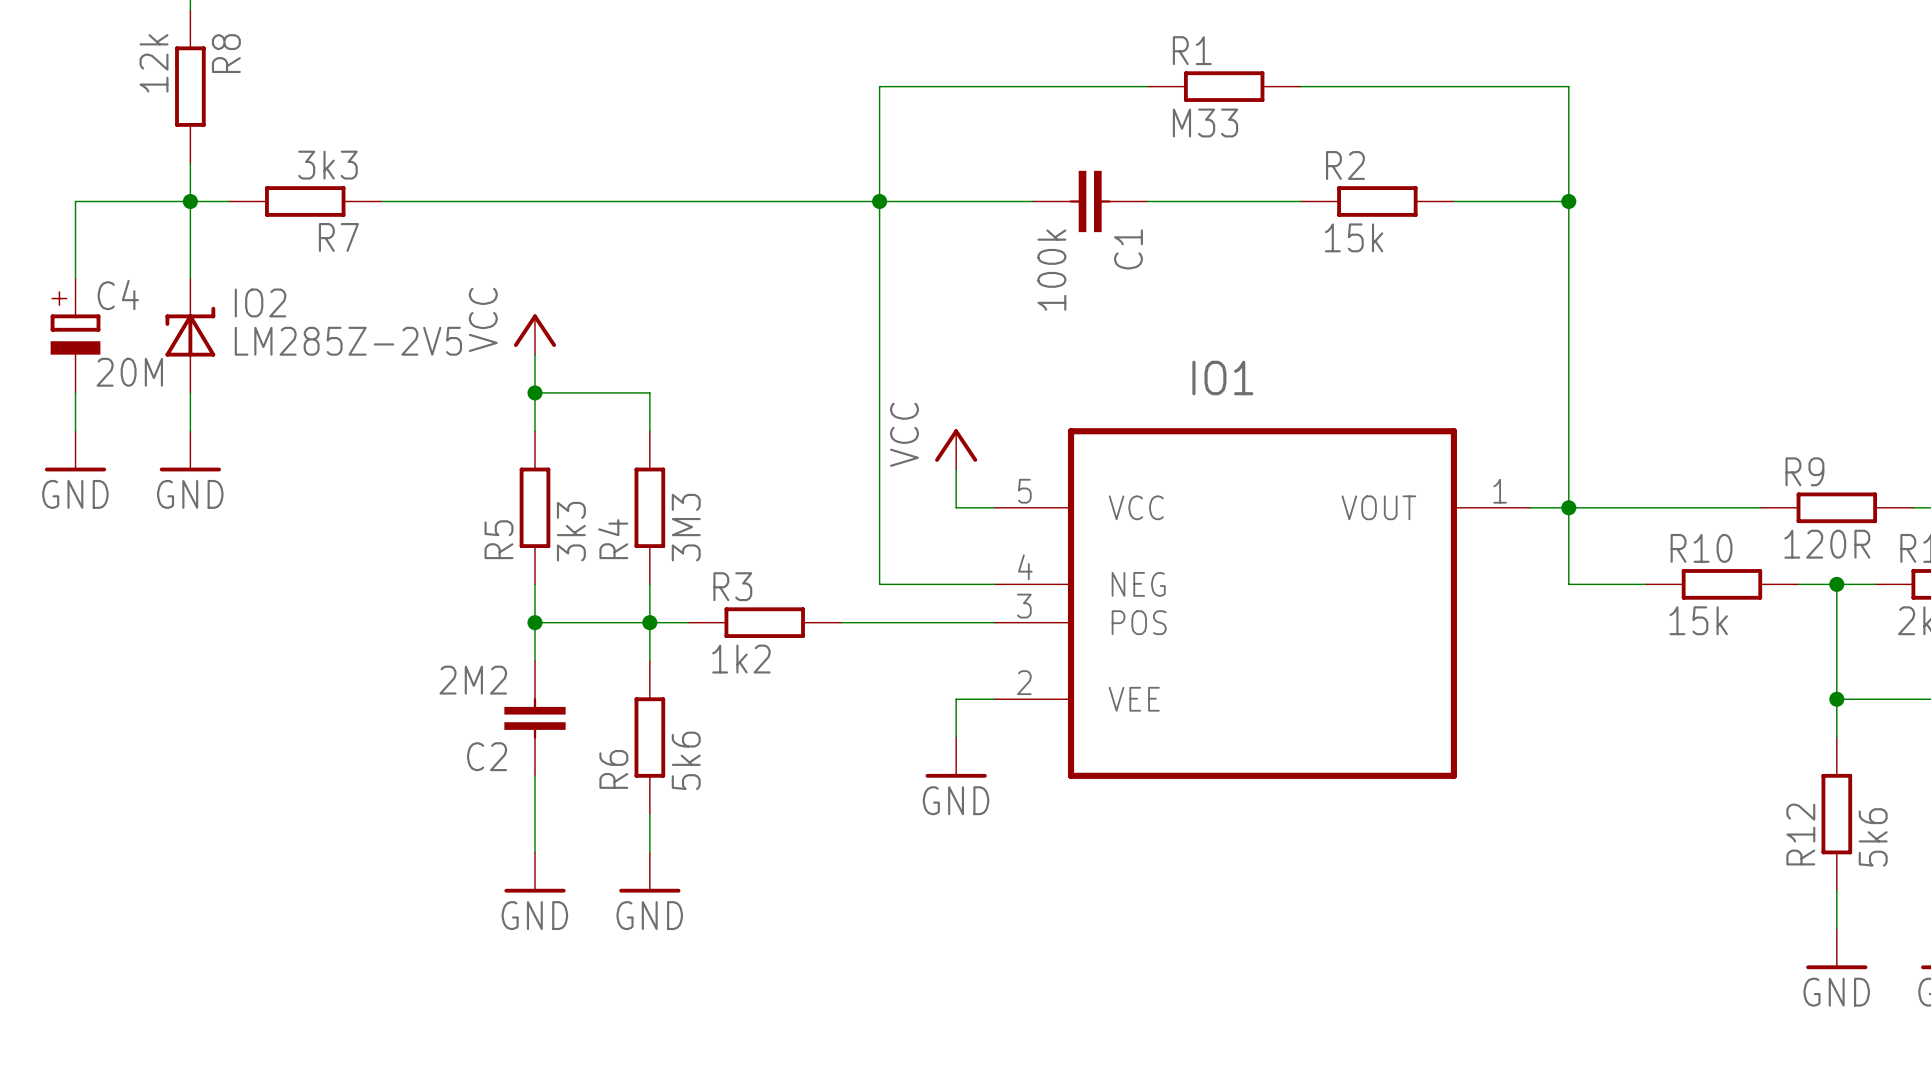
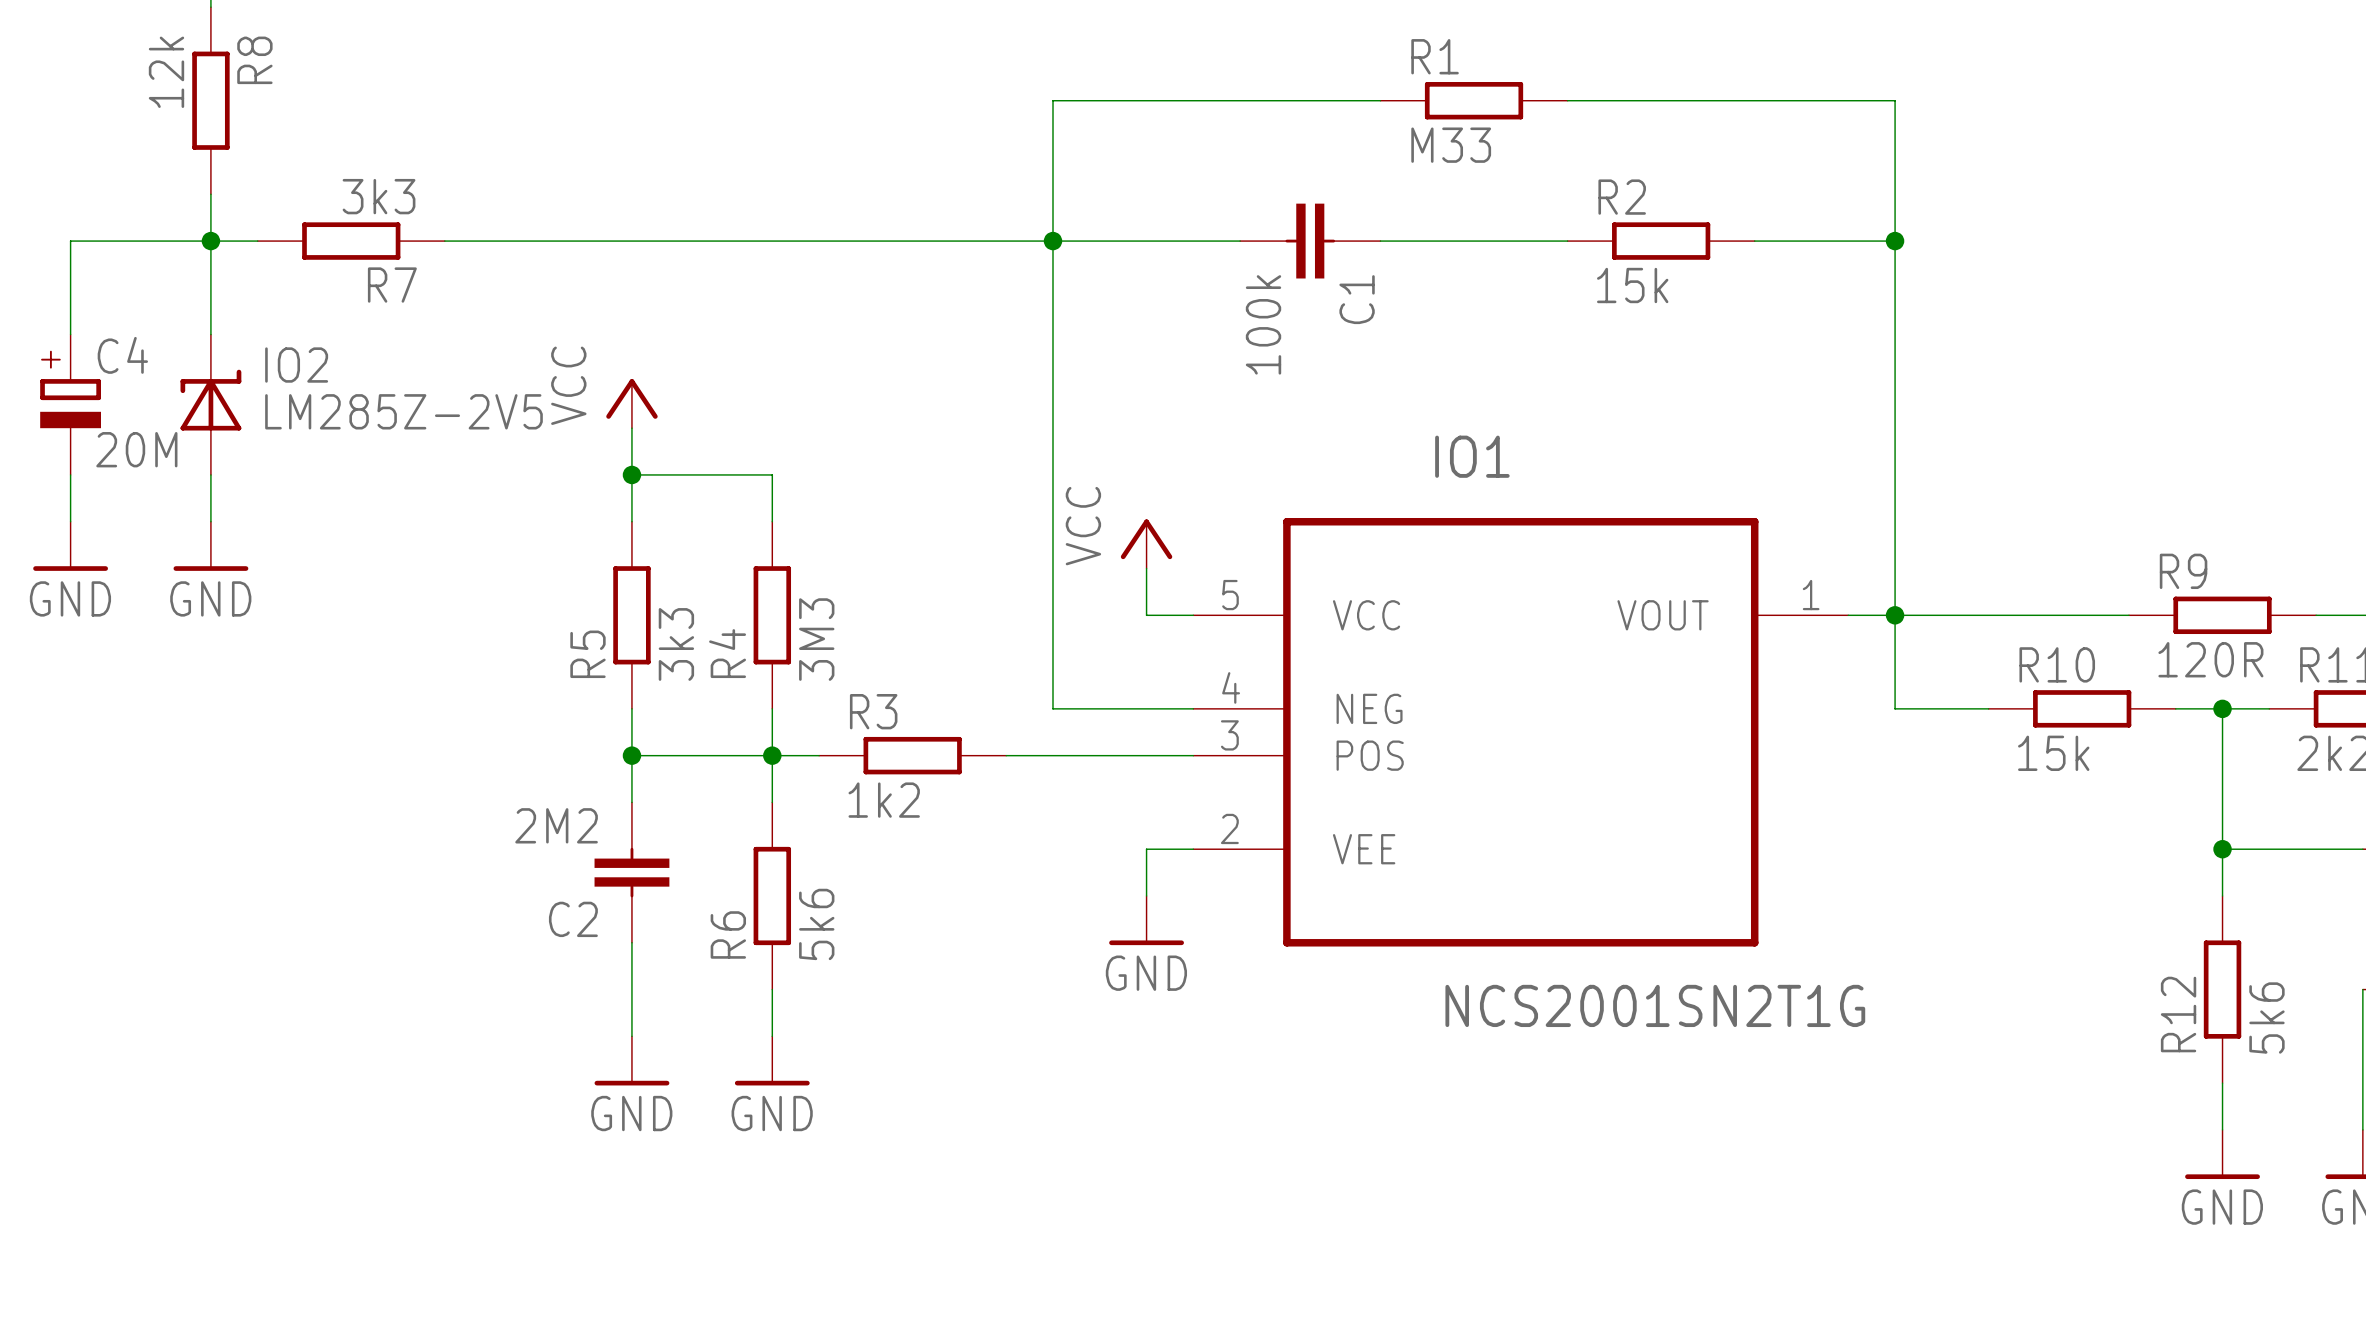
IO1 value: none -> NCS2001SN2T1G (1655, 1005)

